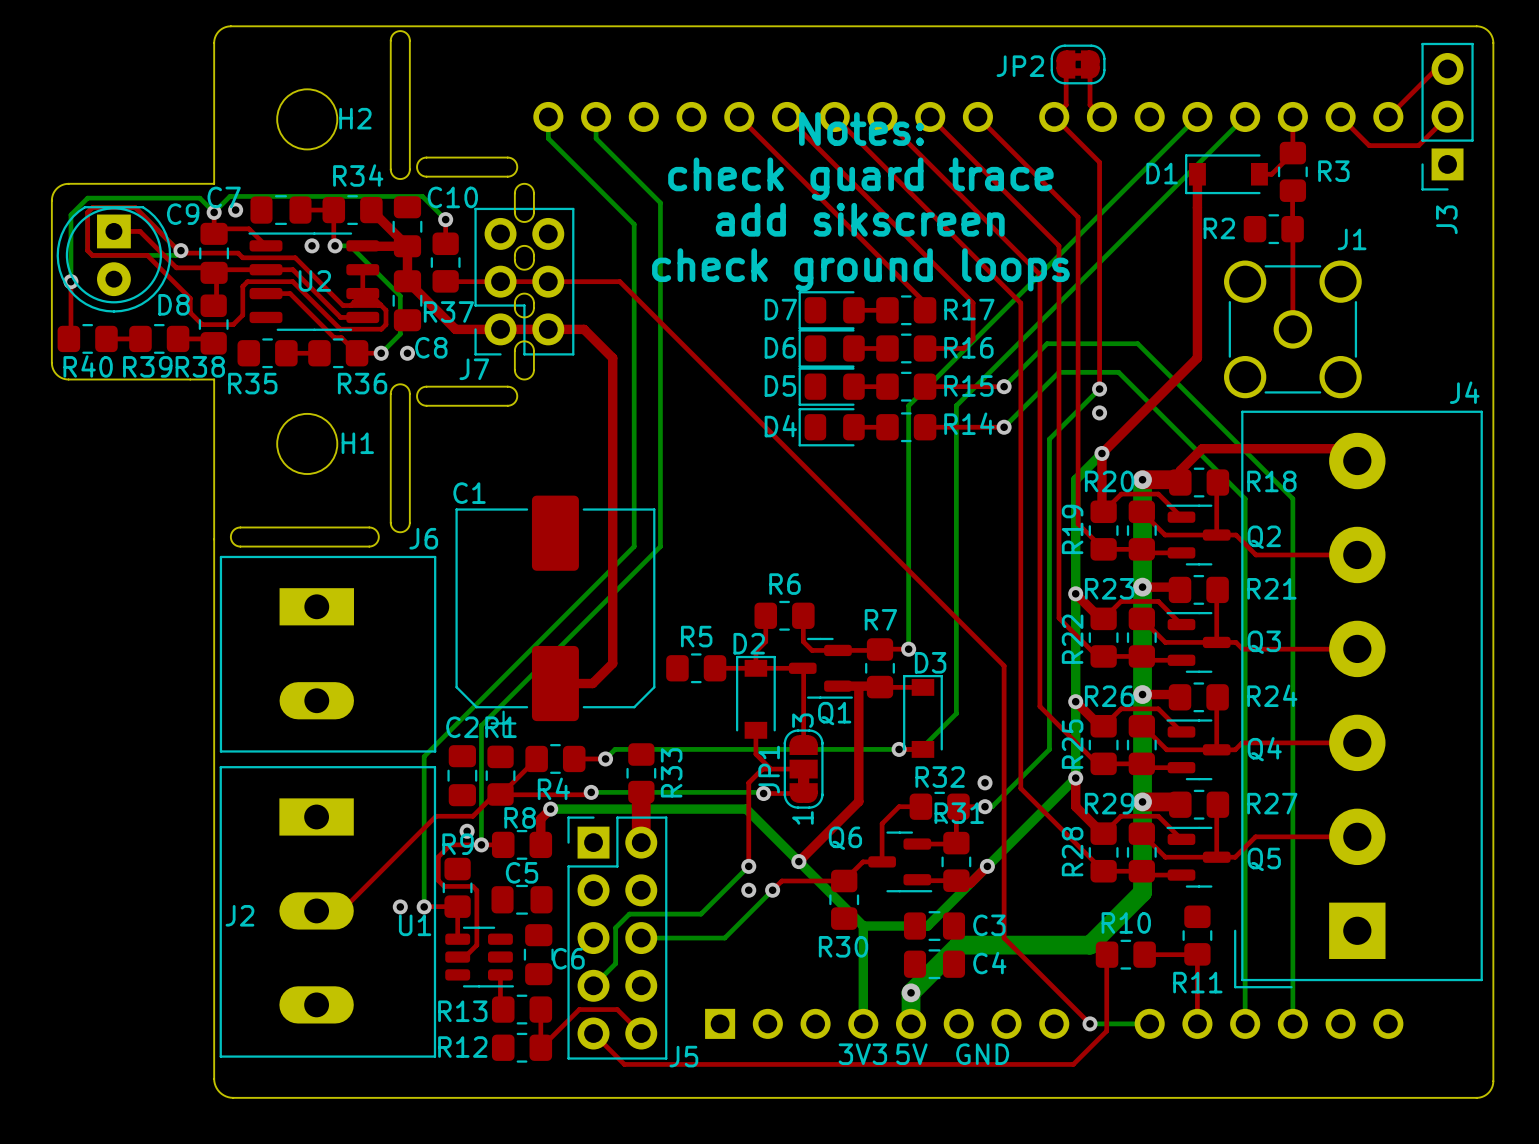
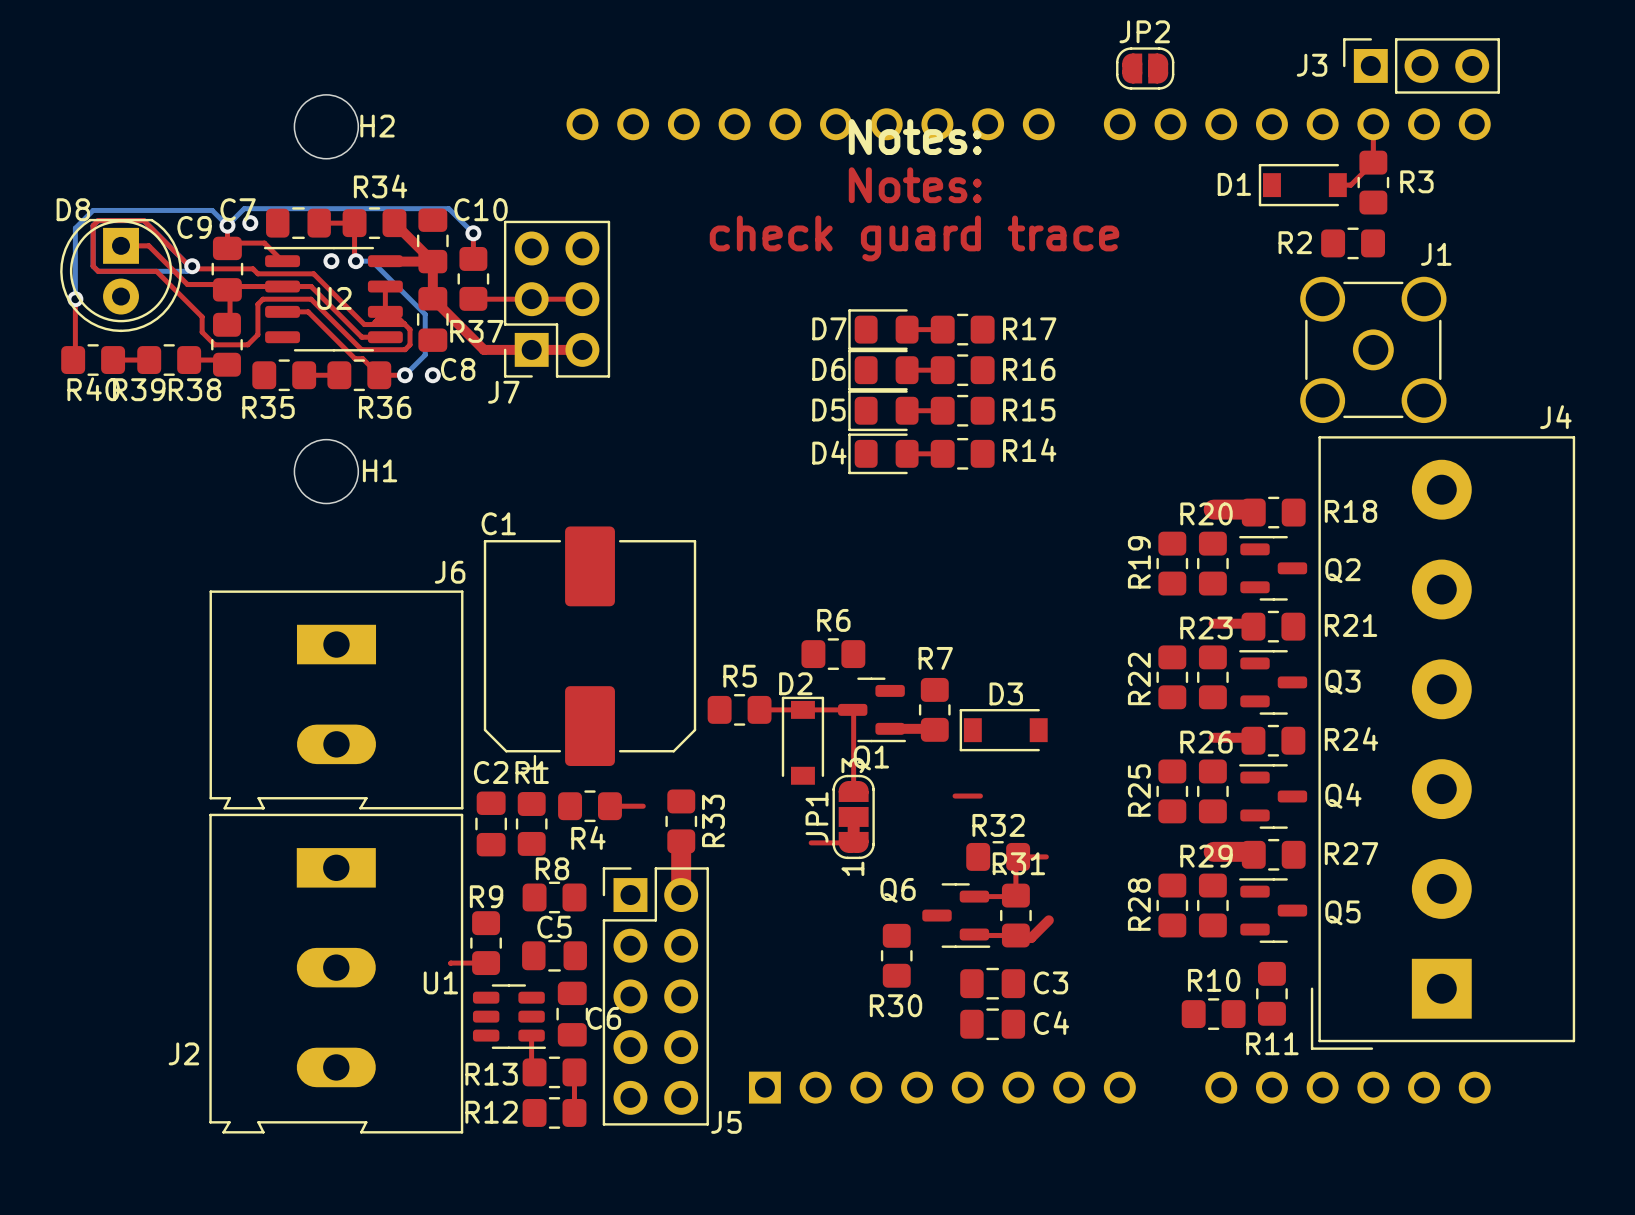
board edge: (230, 26) (1476, 26) (1487, 29) (1491, 35) (1493, 43) (1493, 1081) (1489, 1091) (1483, 1096) (1476, 1097) (233, 1097) (221, 1093) (215, 1086) (214, 1078) (214, 379) (68, 379) (56, 374) (51, 362) (51, 200) (55, 190) (66, 183) (214, 183) (214, 41) (220, 29) (230, 26) -> none
board edge: (390, 40) (390, 170) (394, 177) (401, 178) (407, 176) (409, 169) (409, 39) (406, 33) (399, 31) (393, 33) (390, 40) -> none
JP2 footprint: [1050, 44, 1106, 85] -> [1116, 47, 1175, 90]
top track: (1065, 64) (1066, 105) (1054, 116) (1099, 162) (1099, 389) -> none
top track: (1090, 64) (1090, 105) (1101, 116) -> none
JP2 name position: JP2 (1020, 66) -> JP2 (1144, 31)
top track: (1447, 68) (1436, 68) (1388, 116) -> none
bottom track: (548, 116) (548, 138) (634, 224) (634, 546) (424, 756) (424, 906) -> none
bottom track: (596, 116) (596, 138) (660, 202) (660, 546) (481, 725) (481, 844) -> none
top track: (739, 116) (925, 302) (925, 310) -> none
top track: (787, 116) (973, 303) (973, 338) (963, 348) (925, 348) -> none
bottom track: (1197, 116) (908, 405) (908, 649) -> none
bottom track: (1245, 116) (956, 405) (956, 713) (920, 749) (615, 749) (605, 758) -> none
top track: (1447, 116) (1418, 145) (1369, 145) (1340, 116) -> none
J3 rotation: 0° (1447, 116) -> 90° clockwise (1421, 65)
J3 position: (1447, 116) -> (1421, 65)
top track: (834, 117) (1020, 303) (1020, 788) (1103, 871) (1141, 871) (1145, 875) (1181, 875) -> none
top track: (882, 117) (1039, 274) (1039, 706) (1097, 763) (1141, 763) (1145, 767) (1181, 767) -> none
top track: (930, 117) (1059, 245) (1059, 618) (1097, 656) (1141, 656) (1145, 660) (1181, 660) -> none
top track: (977, 117) (1078, 217) (1078, 523) (1103, 549) (1141, 549) (1145, 552) (1181, 552) -> none
board edge: (426, 157) (508, 157) (515, 161) (517, 168) (514, 174) (508, 176) (425, 176) (419, 173) (417, 167) (419, 160) (426, 157) -> none
top track: (1197, 174) (1197, 358) (1101, 453) (1101, 510) (1103, 511) (1121, 494) (1158, 494) (1181, 517) -> none
text: check guard trace (860, 179) -> Notes: (915, 185)
top track: (1292, 190) (1292, 329) -> none
board edge: (514, 193) (515, 216) (521, 221) (528, 220) (533, 213) (532, 188) (527, 184) (522, 184) (517, 187) (514, 193) -> none
J7 footprint: [474, 207, 575, 356] -> [503, 220, 611, 378]
text: add sikscreen (860, 219) -> check guard trace (914, 238)
board edge: (514, 255) (515, 263) (519, 268) (526, 269) (532, 264) (533, 253) (528, 246) (519, 246) (514, 255) -> none
text: check ground loops (860, 269) -> none
top track: (548, 281) (619, 281) (1004, 665) (1004, 937) (1090, 1023) -> none
board edge: (514, 303) (515, 311) (519, 316) (526, 317) (532, 312) (533, 301) (529, 294) (519, 294) (514, 303) -> none
D8 name position: D8 (174, 304) -> D8 (73, 209)
top track: (548, 329) (584, 329) (612, 358) (612, 663) (592, 683) (555, 683) -> none
board edge: (514, 350) (515, 374) (522, 379) (528, 378) (533, 371) (532, 346) (528, 342) (522, 341) (517, 344) (514, 350) -> none
R39 name position: R39 (147, 366) -> R39 (139, 389)
R38 name position: R38 (200, 366) -> R38 (195, 389)
board edge: (426, 386) (508, 386) (515, 390) (517, 397) (514, 403) (508, 405) (425, 405) (418, 402) (417, 394) (419, 389) (426, 386) -> none
top track: (925, 386) (1004, 386) -> none
bottom track: (1004, 386) (1047, 343) (1137, 343) (1292, 498) (1292, 1023) -> none
via: (1004, 386) -> none
bottom track: (1099, 389) (1049, 439) (1049, 749) (992, 806) (985, 806) -> none
via: (1099, 389) -> none
board edge: (390, 393) (390, 523) (394, 530) (401, 532) (407, 529) (409, 522) (409, 392) (406, 386) (400, 384) (393, 387) (390, 393) -> none
via: (1099, 412) -> none
top track: (925, 427) (1004, 427) -> none
bottom track: (1004, 427) (1059, 372) (1118, 372) (1245, 498) (1245, 1023) -> none
via: (1004, 427) -> none
bottom track: (1101, 453) (1075, 479) (1075, 778) (927, 926) (863, 926) -> none
via: (1101, 453) -> none
top track: (1357, 461) (1345, 448) (1202, 448) (1180, 470) (1180, 482) -> none
bottom track: (1142, 479) (1142, 892) (1090, 945) (958, 945) (911, 992) (911, 1023) -> none
via: (1142, 479) -> none
R20 name position: R20 (1109, 481) -> R20 (1206, 513)
top track: (1217, 482) (1216, 535) -> none
top track: (1141, 511) (1165, 535) (1236, 535) (1255, 554) (1357, 554) -> none
board edge: (240, 527) (370, 527) (376, 531) (378, 538) (376, 543) (369, 546) (239, 546) (232, 542) (230, 537) (233, 530) (240, 527) -> none
J6 footprint: [219, 555, 437, 753] -> [209, 590, 464, 810]
via: (1142, 587) -> none
R23 name position: R23 (1109, 588) -> R23 (1206, 628)
top track: (1217, 589) (1216, 642) -> none
top track: (1075, 593) (1100, 618) (1103, 618) (1121, 601) (1158, 601) (1181, 624) -> none
via: (1075, 593) -> none
top track: (765, 615) (765, 641) (755, 651) (755, 668) -> none
top track: (803, 615) (803, 641) (812, 650) (908, 649) -> none
top track: (1141, 618) (1165, 642) (1236, 642) (1242, 649) (1357, 649) -> none
via: (908, 649) -> none
top track: (858, 687) (858, 801) (798, 861) -> none
top track: (880, 687) (915, 687) -> none
via: (1142, 694) -> none
R26 name position: R26 (1109, 696) -> R26 (1206, 742)
top track: (1217, 697) (1216, 749) -> none
top track: (1075, 701) (1100, 726) (1103, 726) (1121, 708) (1158, 708) (1181, 731) -> none
via: (1075, 701) -> none
Q1 name position: Q1 (834, 713) -> Q1 (871, 757)
D3 rotation: 0° (922, 716) -> 90° counterclockwise (1003, 730)
top track: (1141, 726) (1166, 749) (1235, 749) (1242, 742) (1357, 742) -> none
top track: (755, 730) (755, 754) (770, 769) -> none
via: (899, 749) -> none
top track: (536, 758) (501, 794) (494, 794) (472, 816) (436, 816) (341, 910) (316, 910) -> none
via: (605, 758) -> none
J2 footprint: [219, 766, 437, 1058] -> [209, 813, 464, 1134]
top track: (770, 769) (762, 769) (748, 782) (748, 866) -> none
top track: (770, 769) (803, 769) -> none
top track: (1075, 778) (1075, 806) (1102, 833) (1121, 816) (1158, 816) (1181, 839) -> none
via: (1075, 778) -> none
via: (985, 782) -> none
top track: (591, 792) (588, 794) (500, 794) -> none
bottom track: (591, 792) (763, 793) -> none
via: (591, 792) -> none
via: (763, 793) -> none
via: (1142, 801) -> none
R29 name position: R29 (1109, 803) -> R29 (1206, 856)
top track: (1217, 804) (1216, 857) -> none
top track: (920, 806) (899, 806) (882, 823) (882, 861) (863, 861) (844, 880) -> none
via: (985, 806) -> none
top track: (550, 809) (540, 818) (540, 844) -> none
bottom track: (550, 809) (746, 809) (863, 926) -> none
via: (550, 809) -> none
via: (467, 831) -> none
top track: (1141, 833) (1165, 857) (1235, 857) (1255, 836) (1357, 836) -> none
via: (481, 844) -> none
top track: (503, 844) (450, 844) (438, 856) (438, 880) (444, 886) (472, 886) (476, 890) (476, 945) (464, 957) (457, 957) -> none
via: (798, 861) -> none
bottom track: (748, 866) (701, 914) (629, 914) (615, 927) (615, 963) (593, 985) -> none
via: (748, 866) -> none
via: (987, 866) -> none
top track: (844, 880) (781, 880) (772, 890) -> none
via: (748, 890) -> none
bottom track: (772, 890) (724, 938) (641, 938) -> none
via: (772, 890) -> none
via: (400, 906) -> none
via: (424, 906) -> none
top track: (457, 906) (457, 939) -> none
J2 name position: J2 (239, 915) -> J2 (183, 1053)
bottom track: (863, 926) (863, 1023) -> none
top track: (1107, 954) (1106, 1031) (1073, 1064) (624, 1064) (593, 1033) -> none
R10 position: (1125, 954) -> (1213, 1014)
top track: (1144, 954) (1195, 954) (1197, 956) (1197, 1023) -> none
via: (911, 992) -> none
bottom track: (1090, 1023) (1149, 1023) -> none
via: (1090, 1023) -> none
top track: (641, 1033) (617, 1009) (579, 1009) (541, 1047) -> none
text: 3V3 (862, 1054) -> none
text: 5V (911, 1054) -> none
text: GND (982, 1054) -> none

